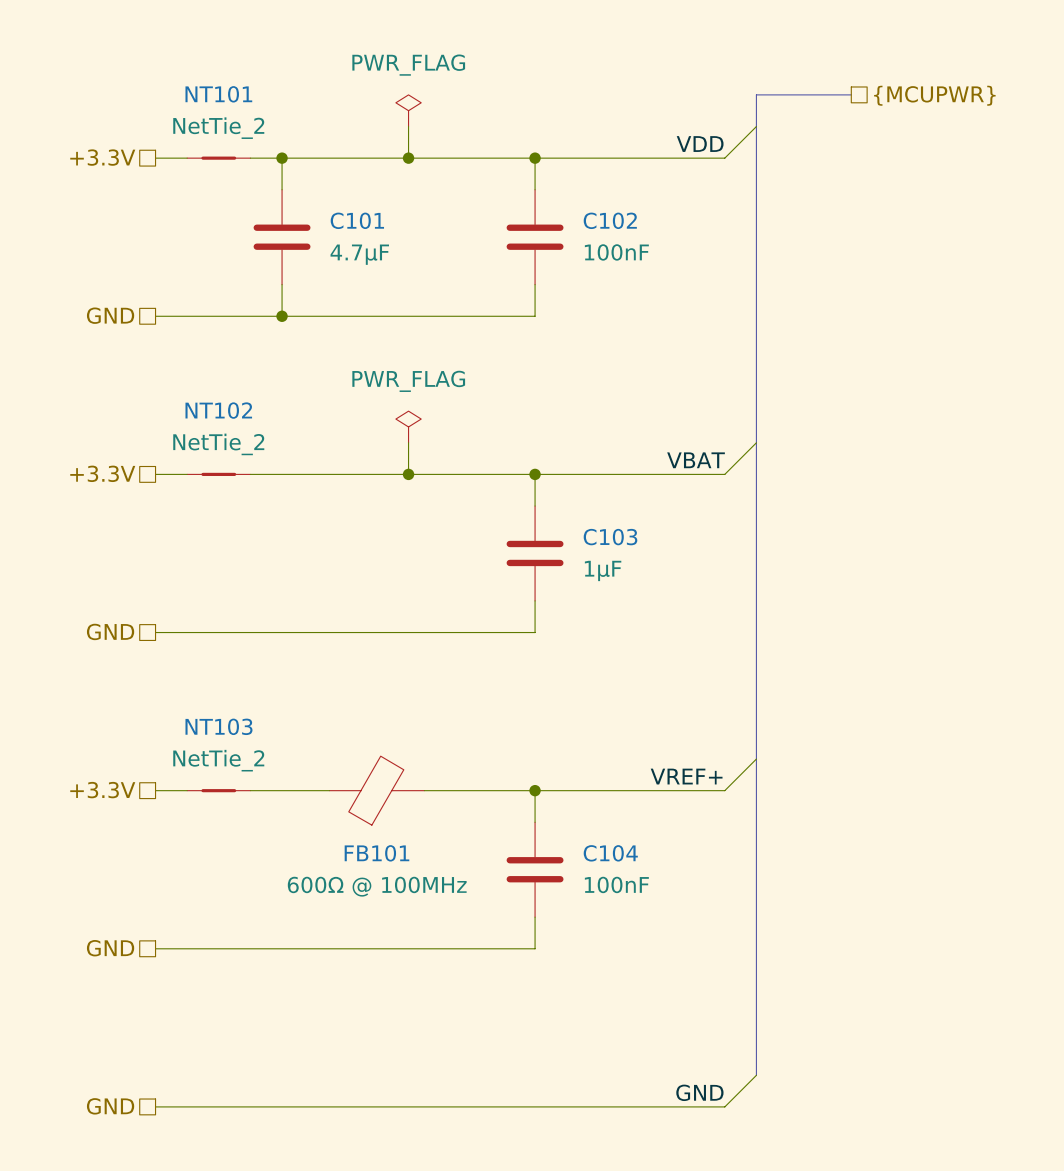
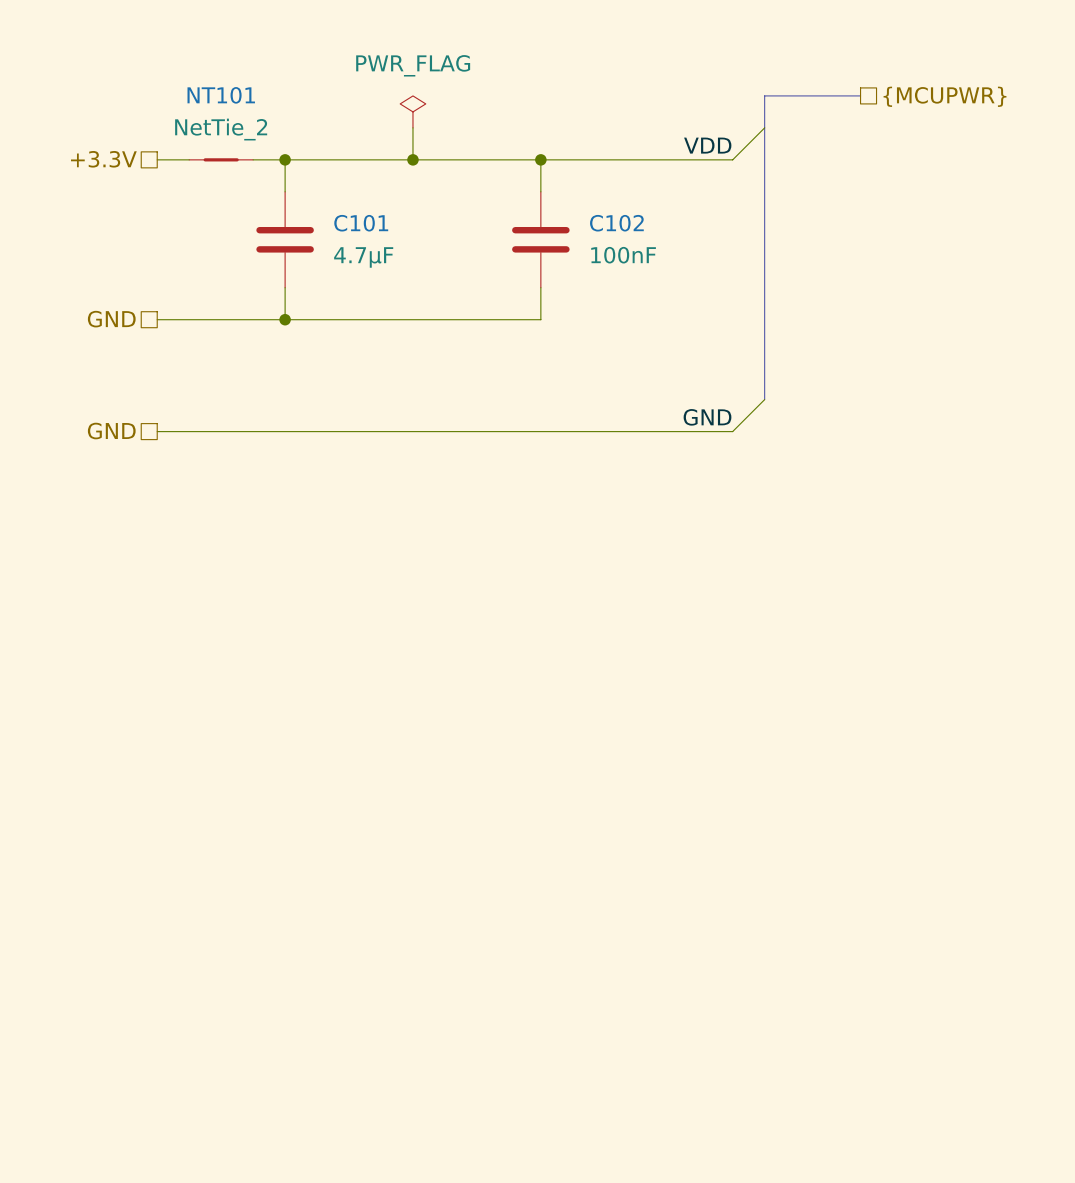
wire: none -> (764, 399) (732, 431) (157, 431)
bus: (756, 395) (756, 1075) -> none
label: none -> GND (707, 417)
power symbol: PWR_FLAG (408, 426) -> none
wire: (408, 442) (408, 474) -> none
wire: (756, 442) (724, 474) (250, 474) -> none
label: VBAT (696, 460) -> none
hierarchical label: +3.3V (102, 473) -> none
wire: (155, 474) (187, 474) -> none
NT102: NetTie_2 (218, 474) -> none
junction: (408, 474) -> none
wire: (535, 474) (535, 506) -> none
junction: (535, 474) -> none
C103: 1µF (535, 553) -> none
wire: (535, 600) (535, 632) (155, 632) -> none
hierarchical label position: GND (110, 631) -> GND (111, 431)
wire: (756, 759) (724, 790) (424, 790) -> none
label: VREF+ (686, 776) -> none
hierarchical label: +3.3V (102, 790) -> none
wire: (155, 790) (187, 790) -> none
NT103: NetTie_2 (218, 790) -> none
wire: (250, 790) (329, 790) -> none
FB101: 600Ω @ 100MHz (376, 790) -> none
wire: (535, 790) (535, 822) -> none
junction: (535, 790) -> none
C104: 100nF (535, 869) -> none
wire: (535, 917) (535, 948) (155, 948) -> none
hierarchical label: GND (110, 948) -> none
wire: (756, 1075) (724, 1106) (155, 1106) -> none
label: GND (699, 1092) -> none
hierarchical label: GND (110, 1106) -> none

